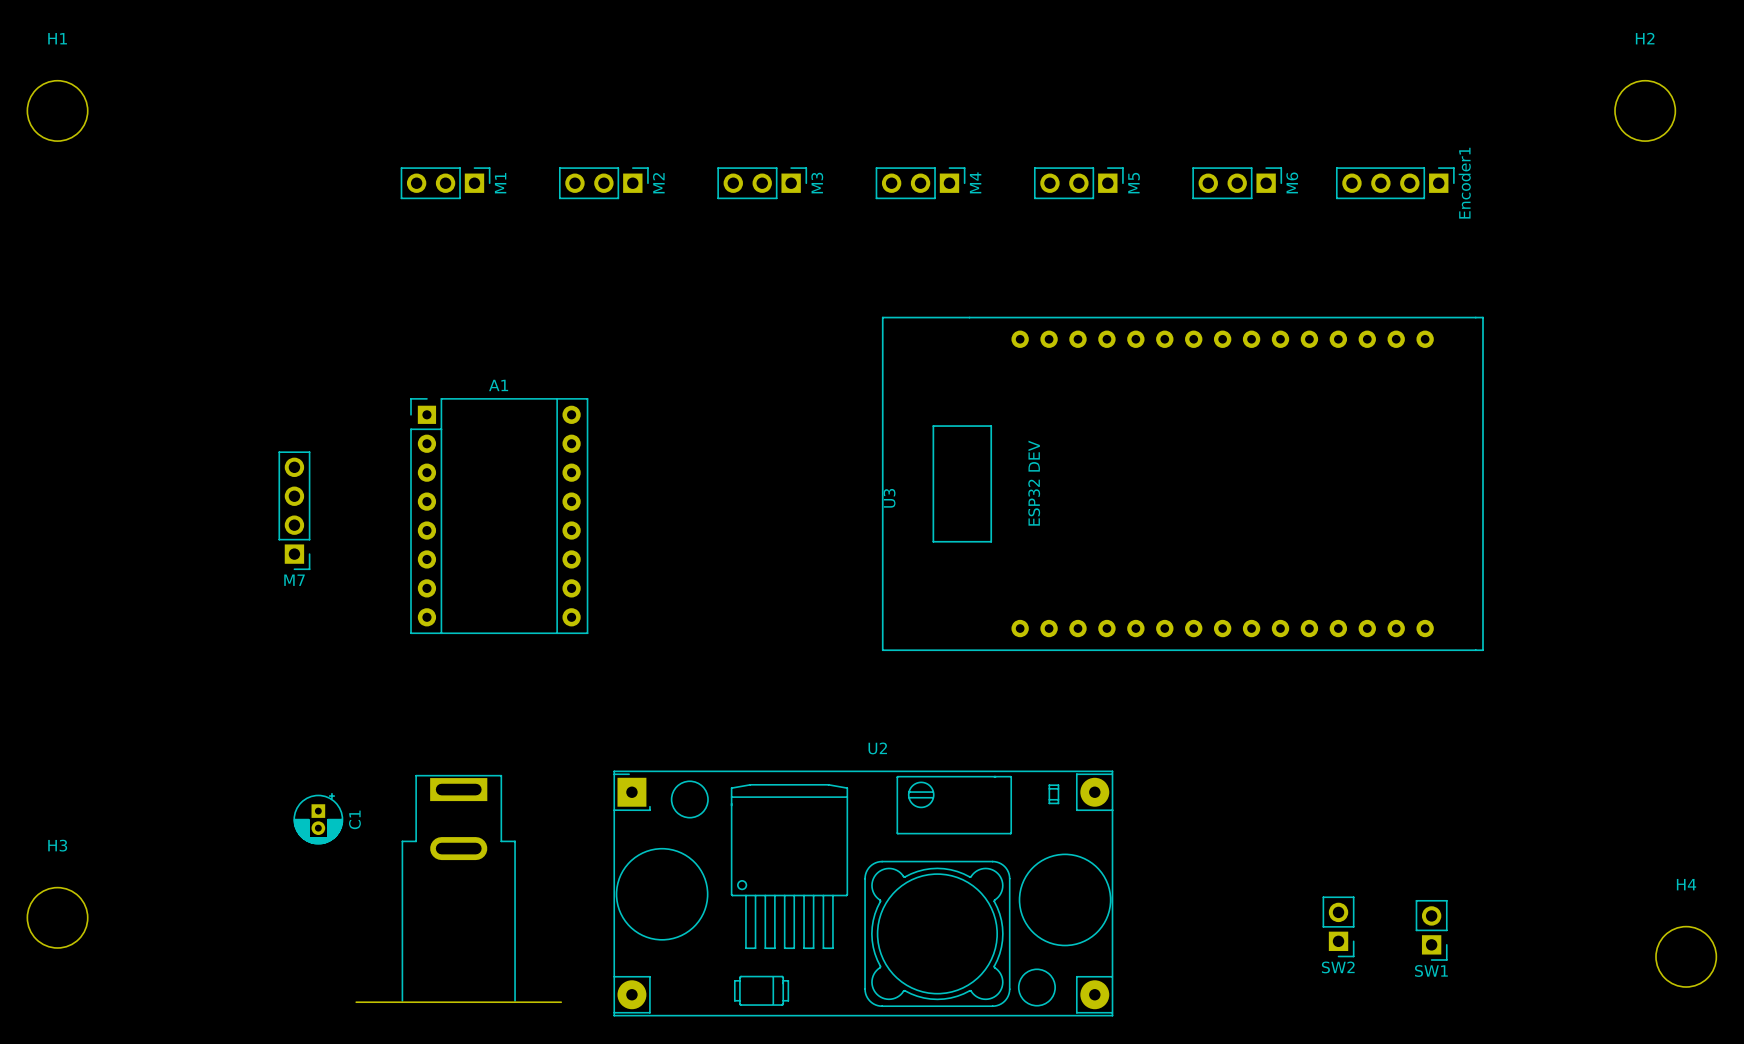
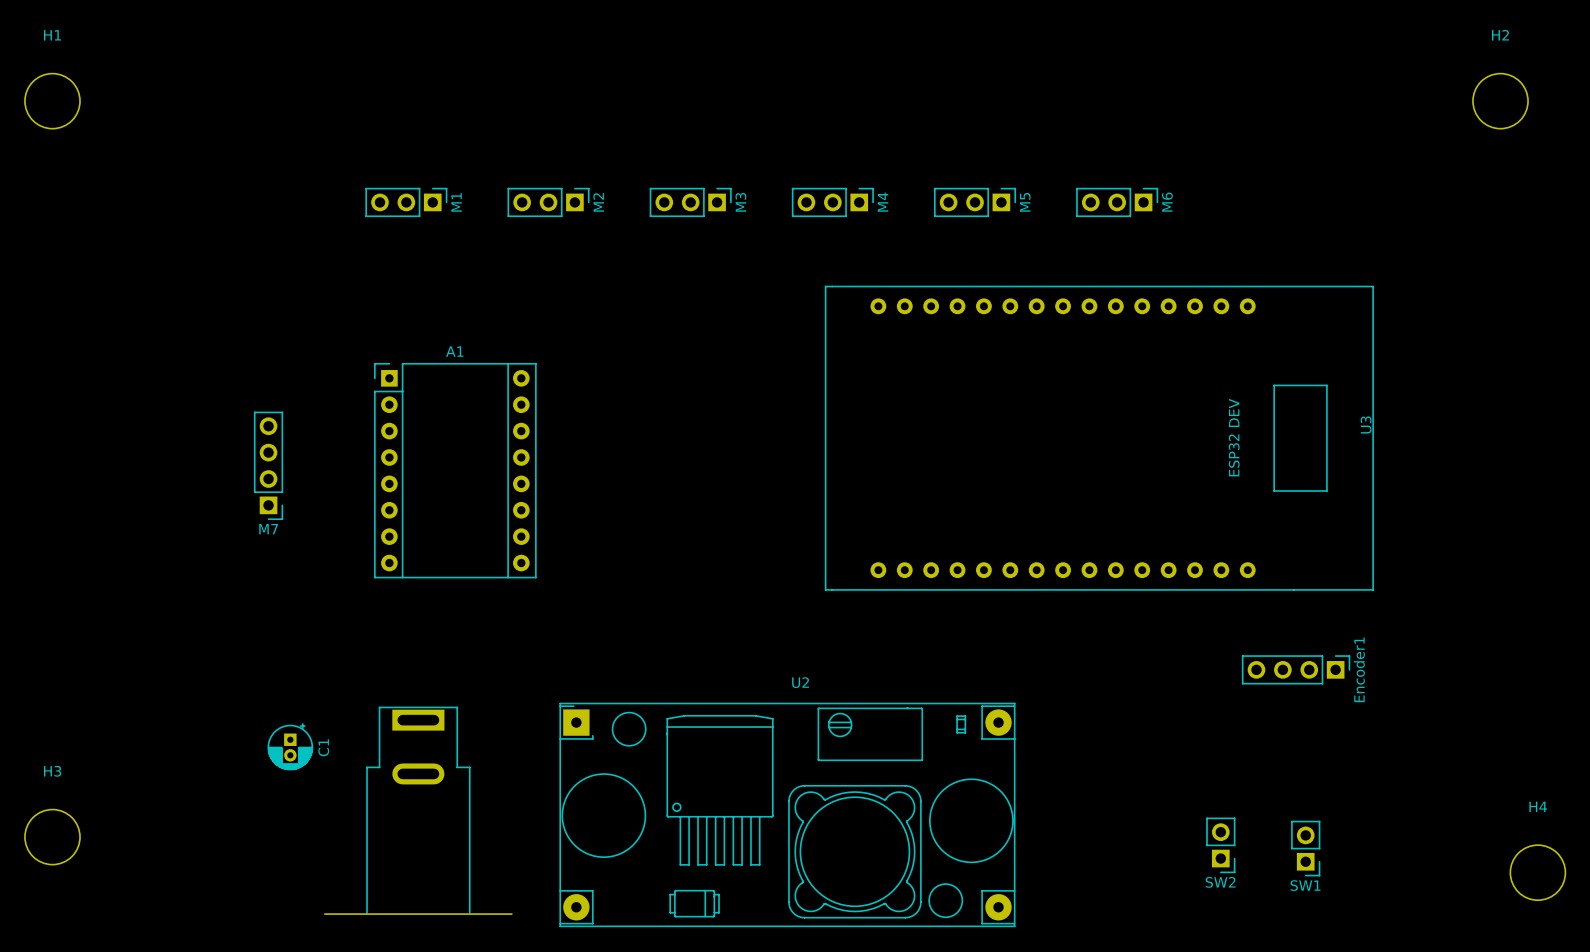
M1 position: (445, 183) -> (406, 202)
M2 position: (603, 183) -> (548, 202)
M3 position: (762, 183) -> (690, 202)
M4 position: (920, 183) -> (832, 202)
M5 position: (1078, 183) -> (975, 202)
M6 position: (1237, 183) -> (1117, 202)
Encoder1 position: (1395, 183) -> (1296, 669)
U3 rotation: 0° (1182, 483) -> 180° (1099, 438)

